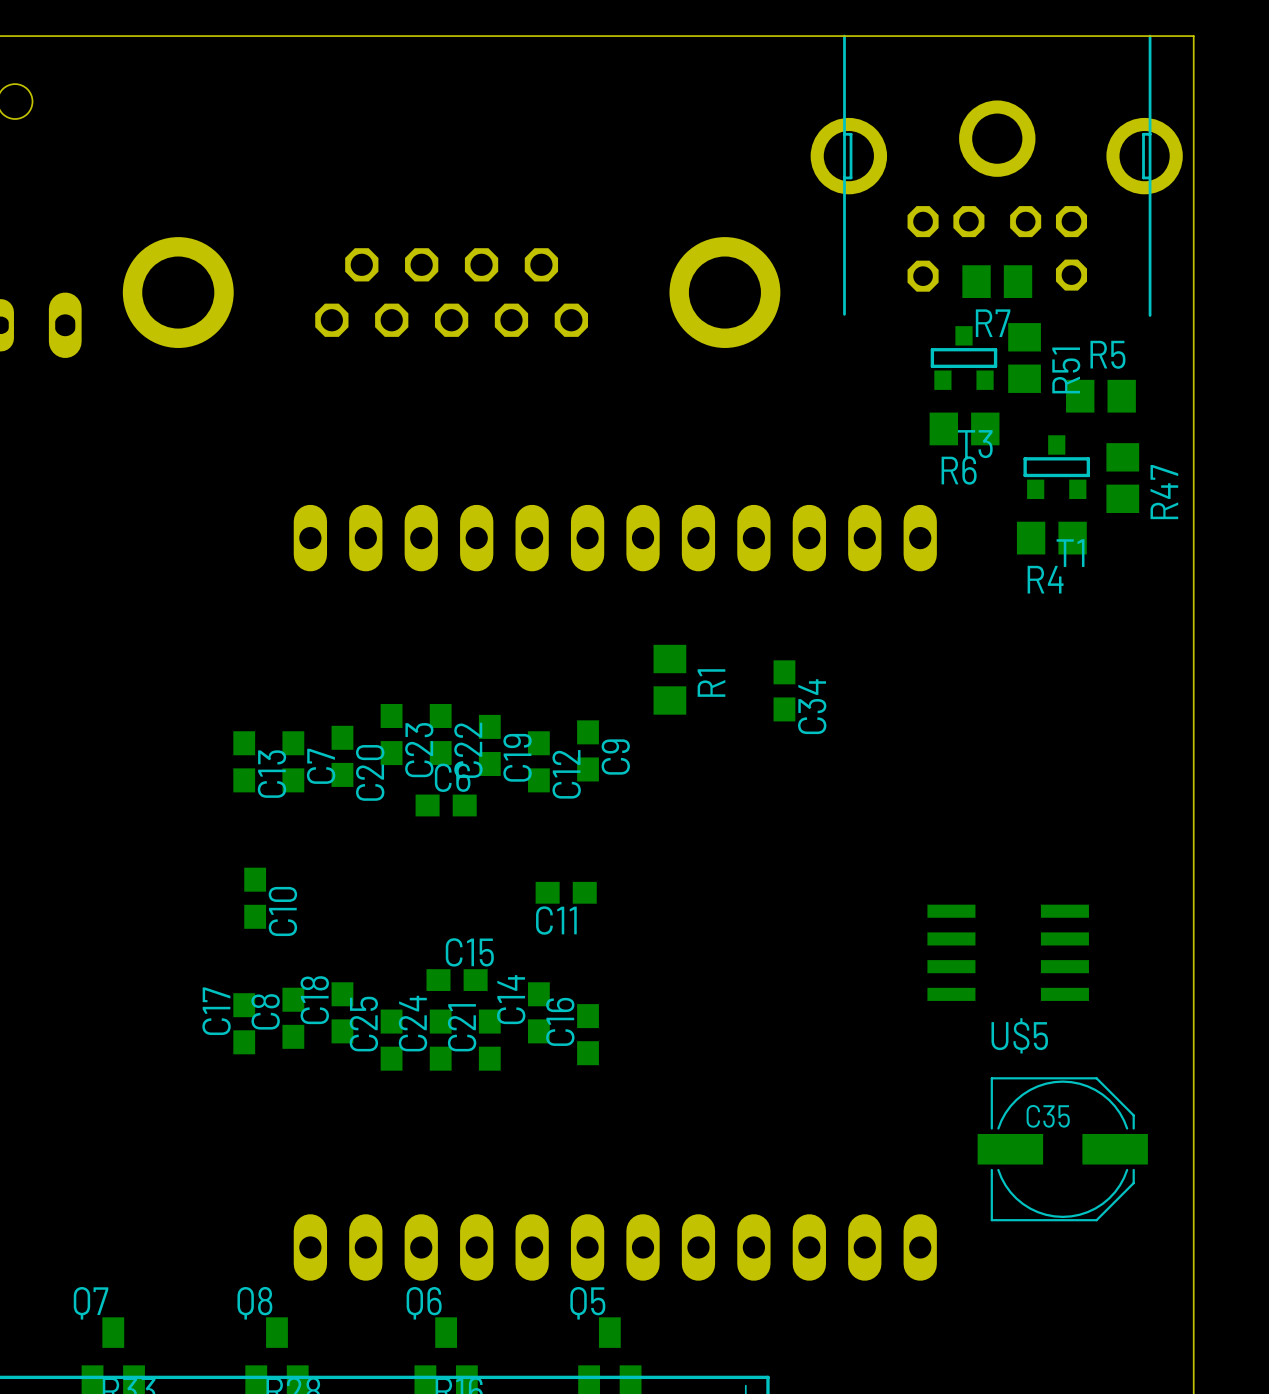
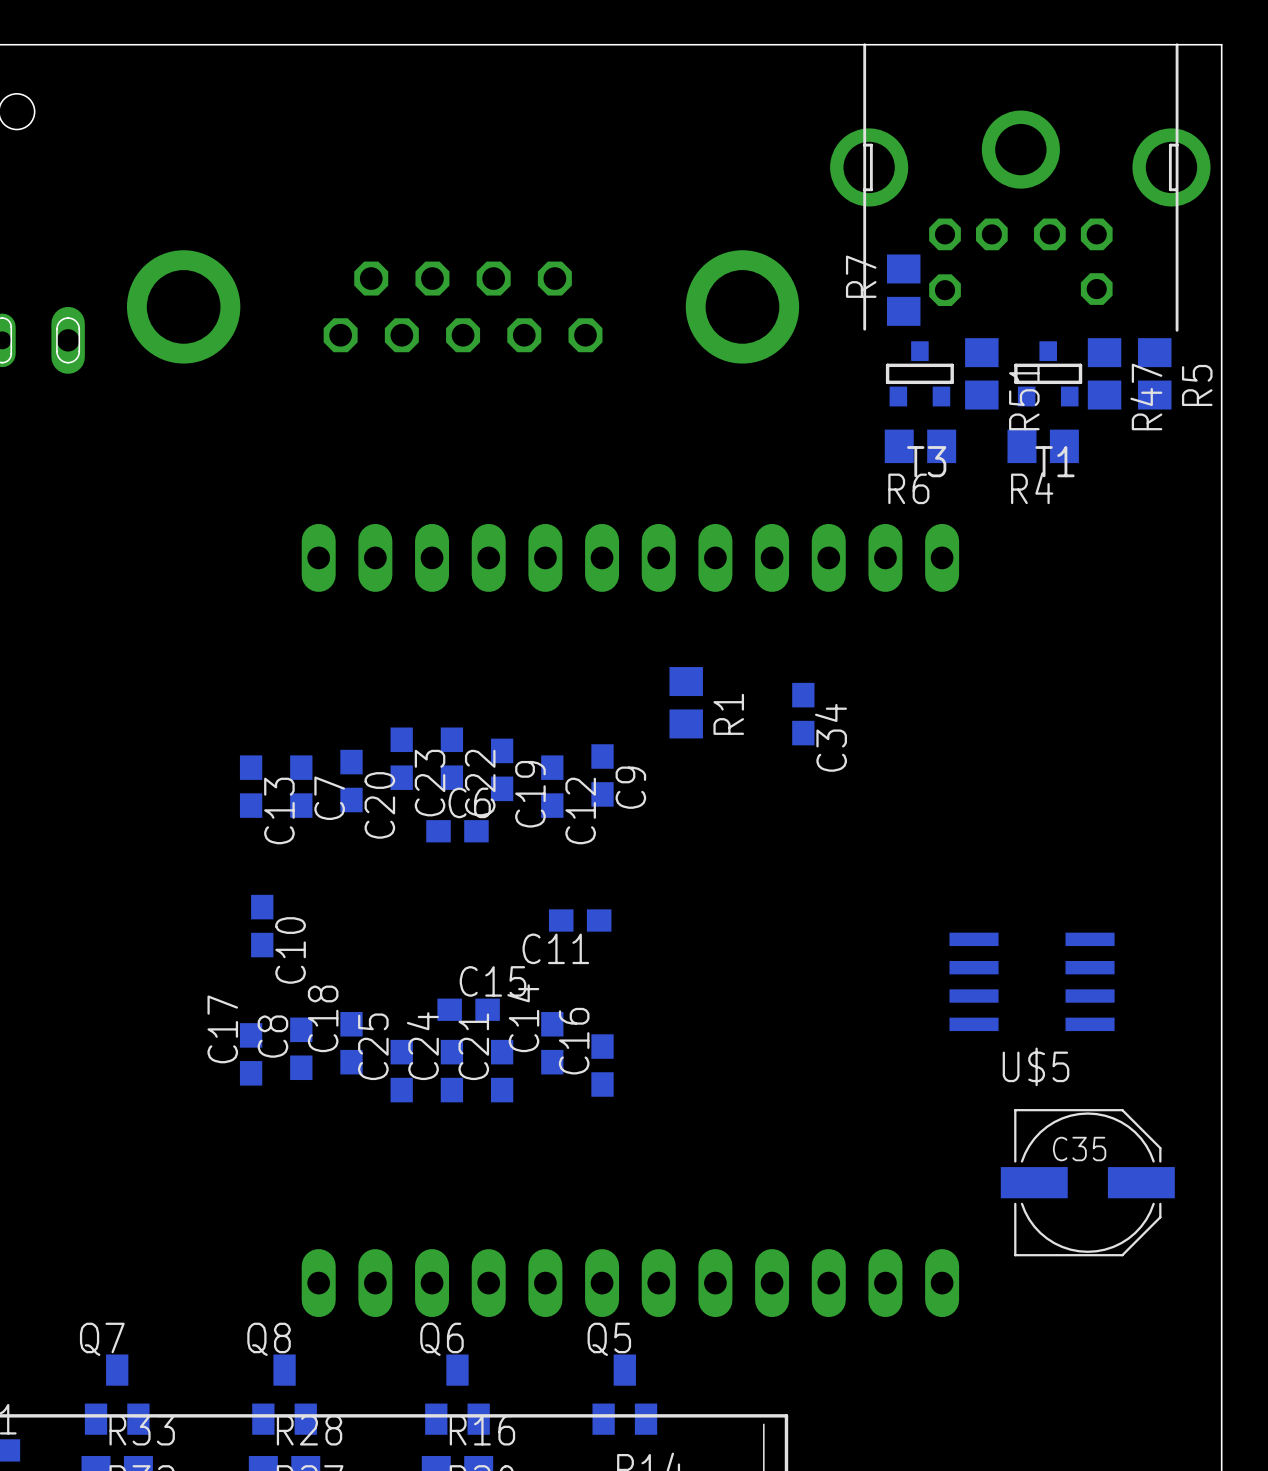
R7 rotation: 0° (997, 281) -> 90° clockwise (903, 290)
R7 position: (997, 281) -> (903, 290)
T3 position: (963, 358) -> (919, 373)
R51 position: (1024, 358) -> (981, 373)
R5 rotation: 0° (1100, 396) -> 90° clockwise (1154, 373)
R5 position: (1100, 396) -> (1154, 373)
R6 position: (964, 428) -> (920, 446)
T1 position: (1056, 467) -> (1048, 373)
R47 position: (1122, 478) -> (1104, 373)
R4 position: (1051, 538) -> (1043, 446)

